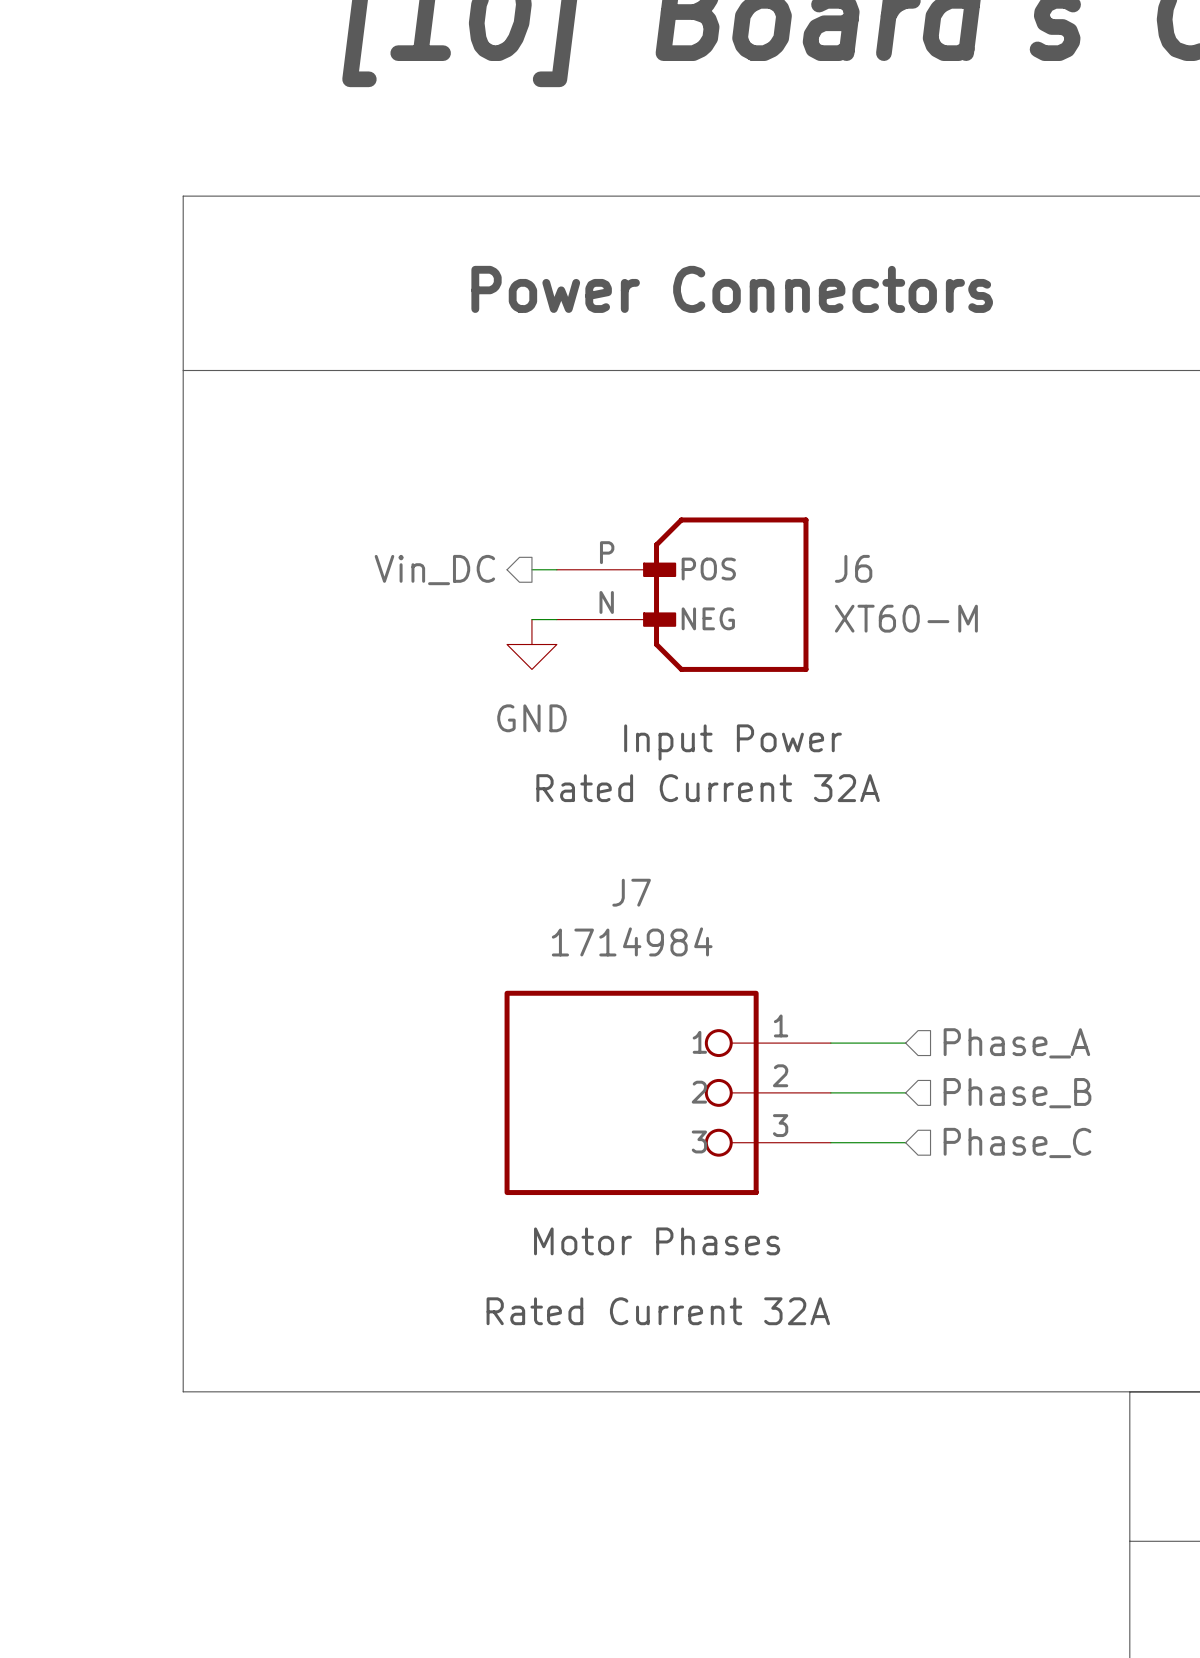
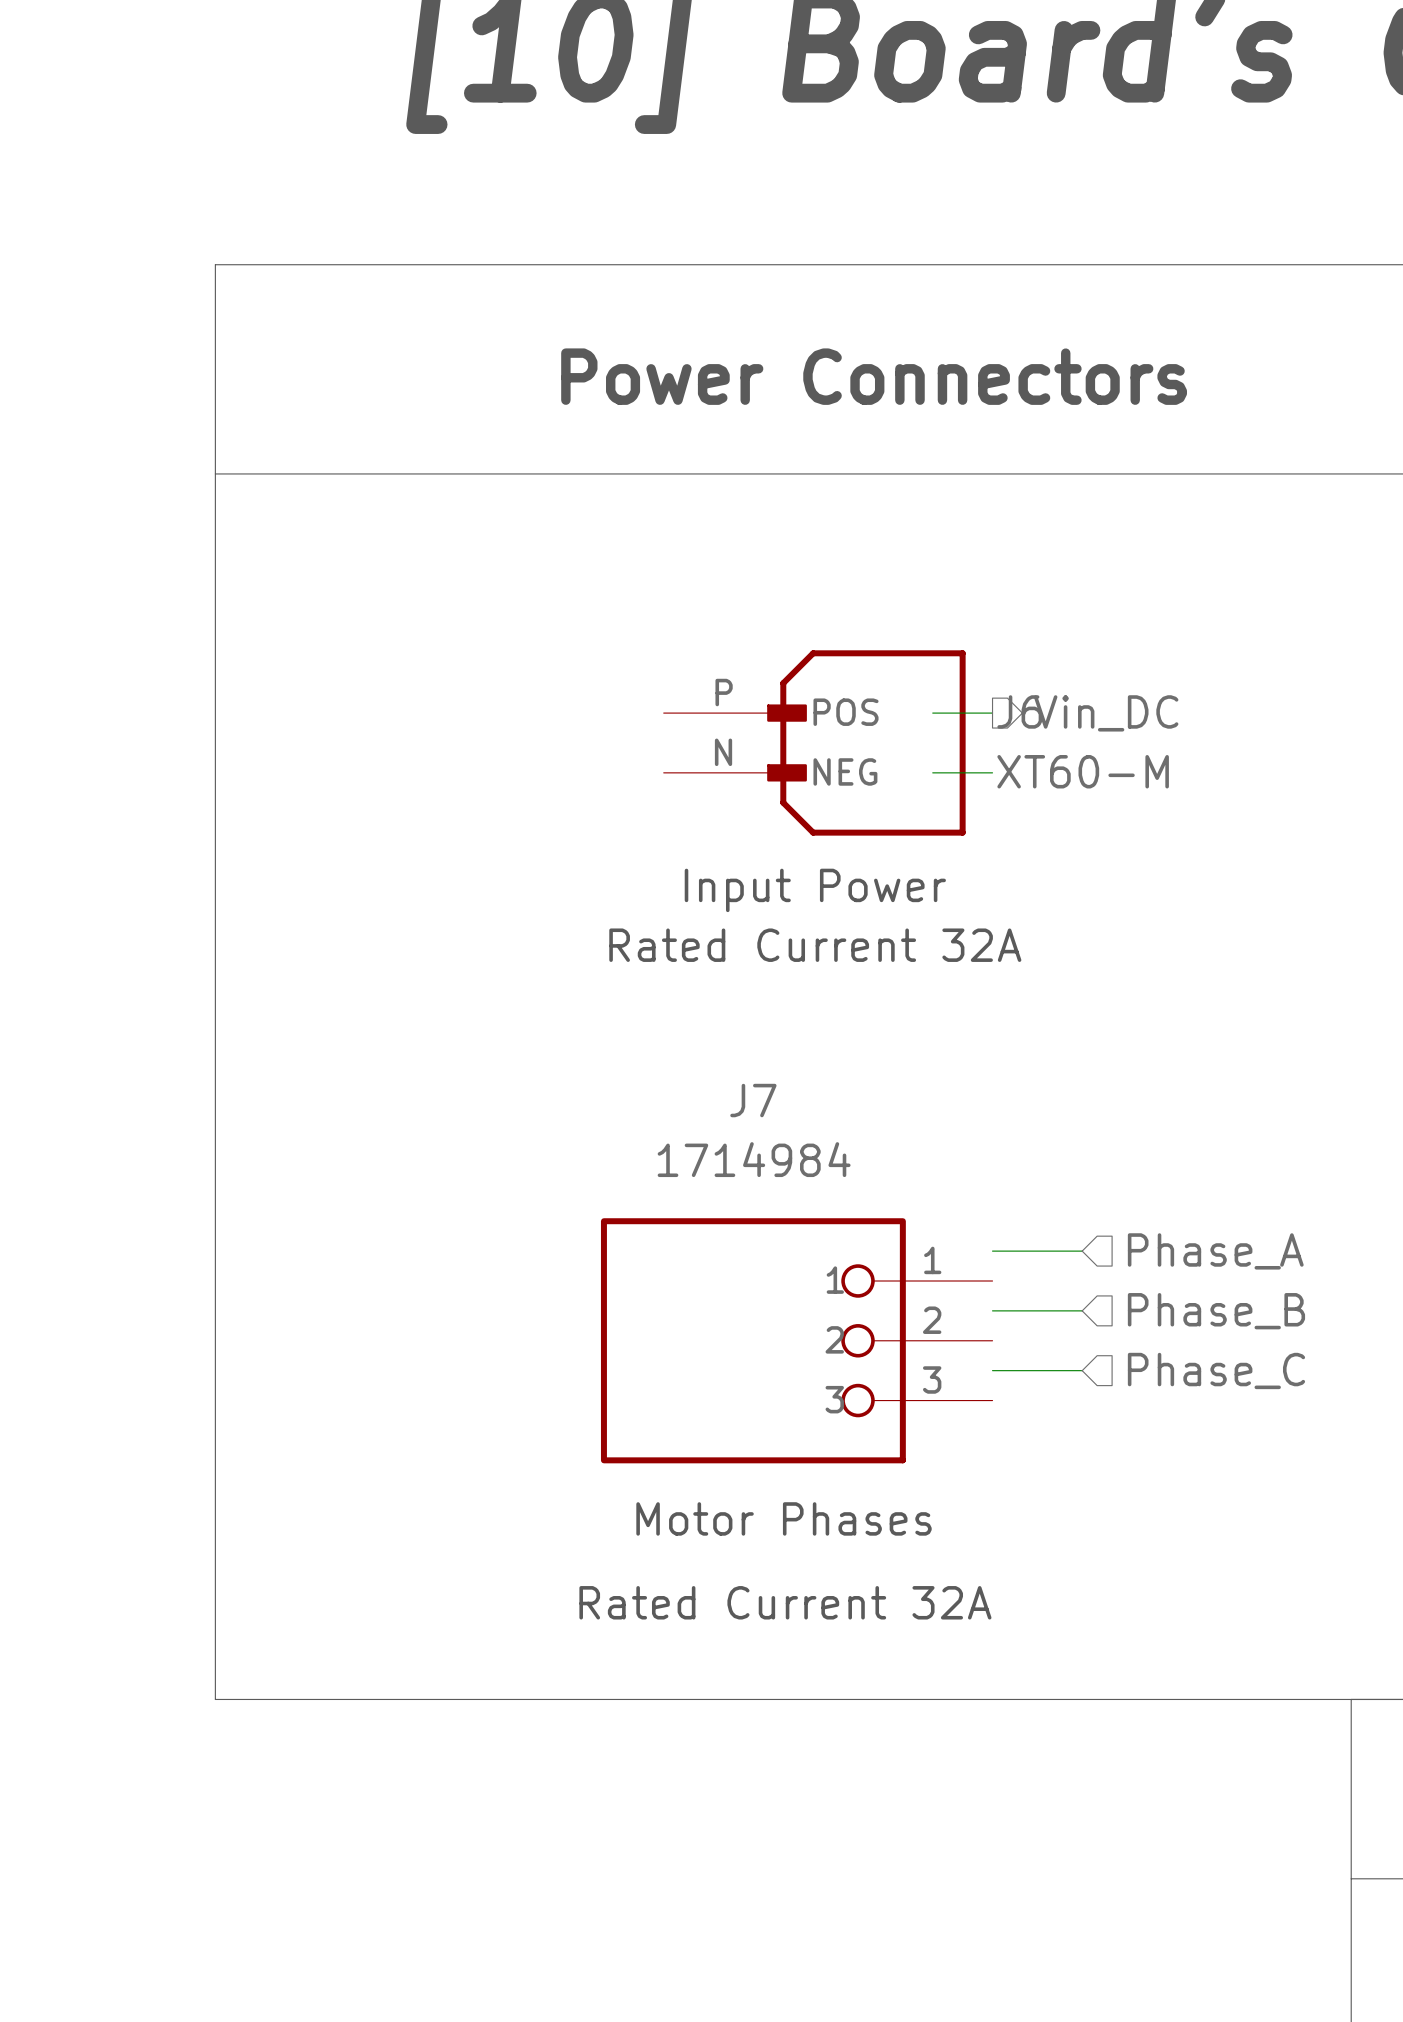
wire: (531, 569) (556, 569) -> none
wire: none -> (932, 713) (992, 713)
hierarchical label rotation: 0° (434, 570) -> 180° (1106, 713)
hierarchical label position: Vin_DC (434, 570) -> Vin_DC (1106, 713)
wire: (531, 619) (556, 619) -> none
wire: none -> (932, 772) (992, 772)
power symbol: GND (531, 644) -> none
text position: Input Power (733, 742) -> Input Power (815, 890)
text position: Rated Current 32A (708, 788) -> Rated Current 32A (815, 945)
wire: (830, 1043) (905, 1043) -> (992, 1251) (1082, 1251)
hierarchical label position: Phase_A (1016, 1043) -> Phase_A (1215, 1251)
wire: (830, 1092) (905, 1092) -> (992, 1310) (1082, 1310)
hierarchical label position: Phase_B (1017, 1093) -> Phase_B (1216, 1311)
wire: (830, 1142) (905, 1142) -> (992, 1370) (1082, 1370)
hierarchical label position: Phase_C (1017, 1142) -> Phase_C (1216, 1370)

